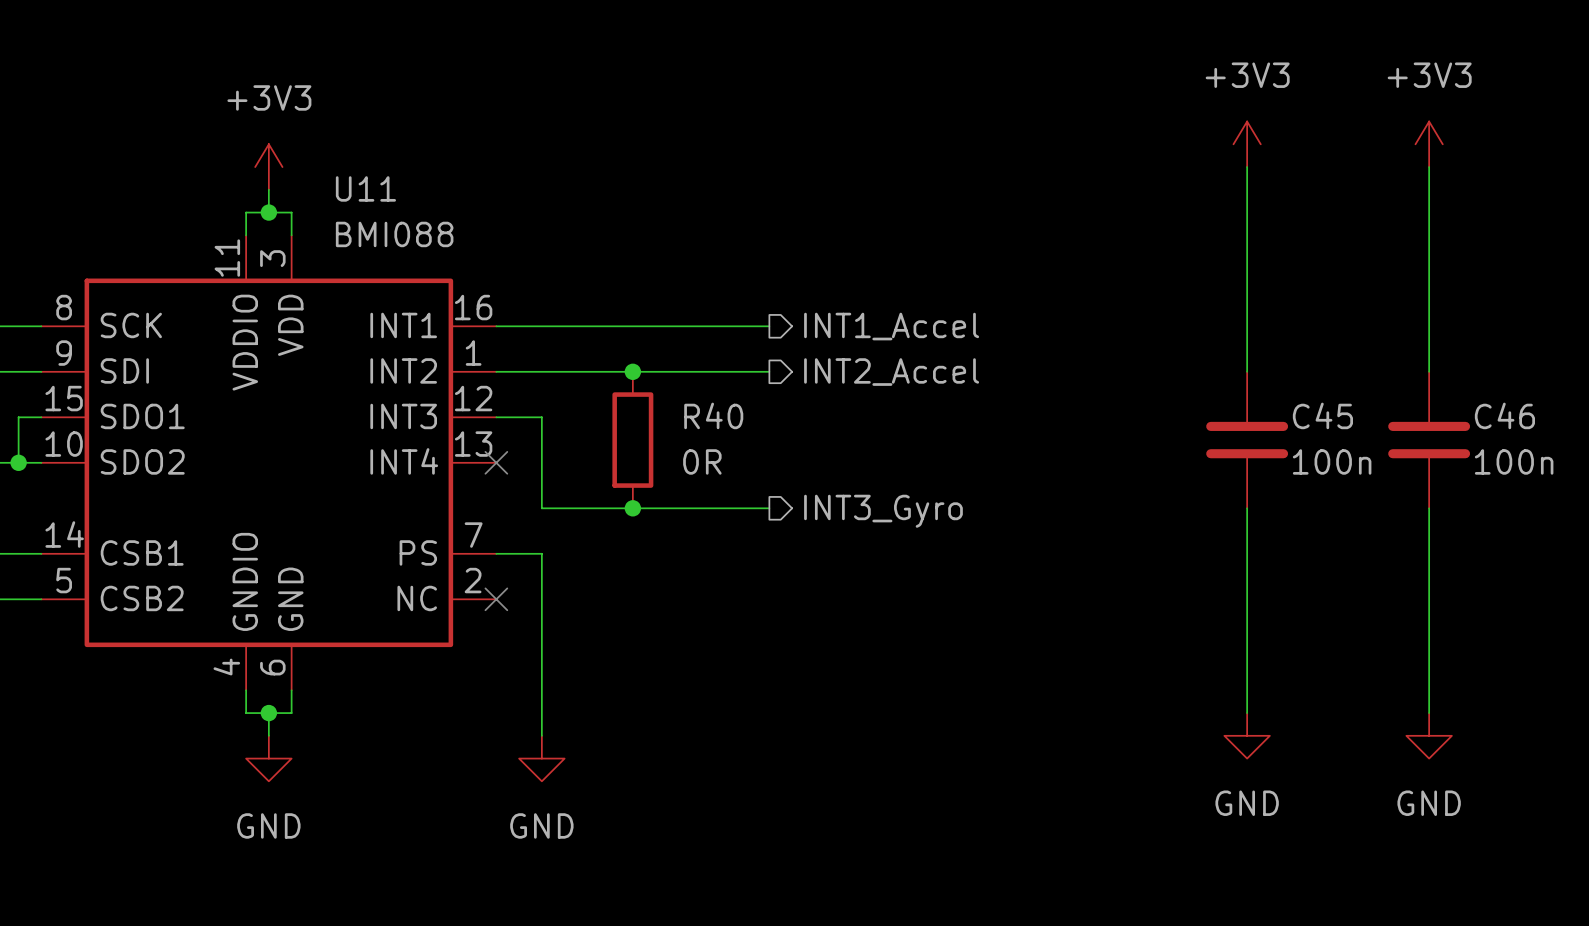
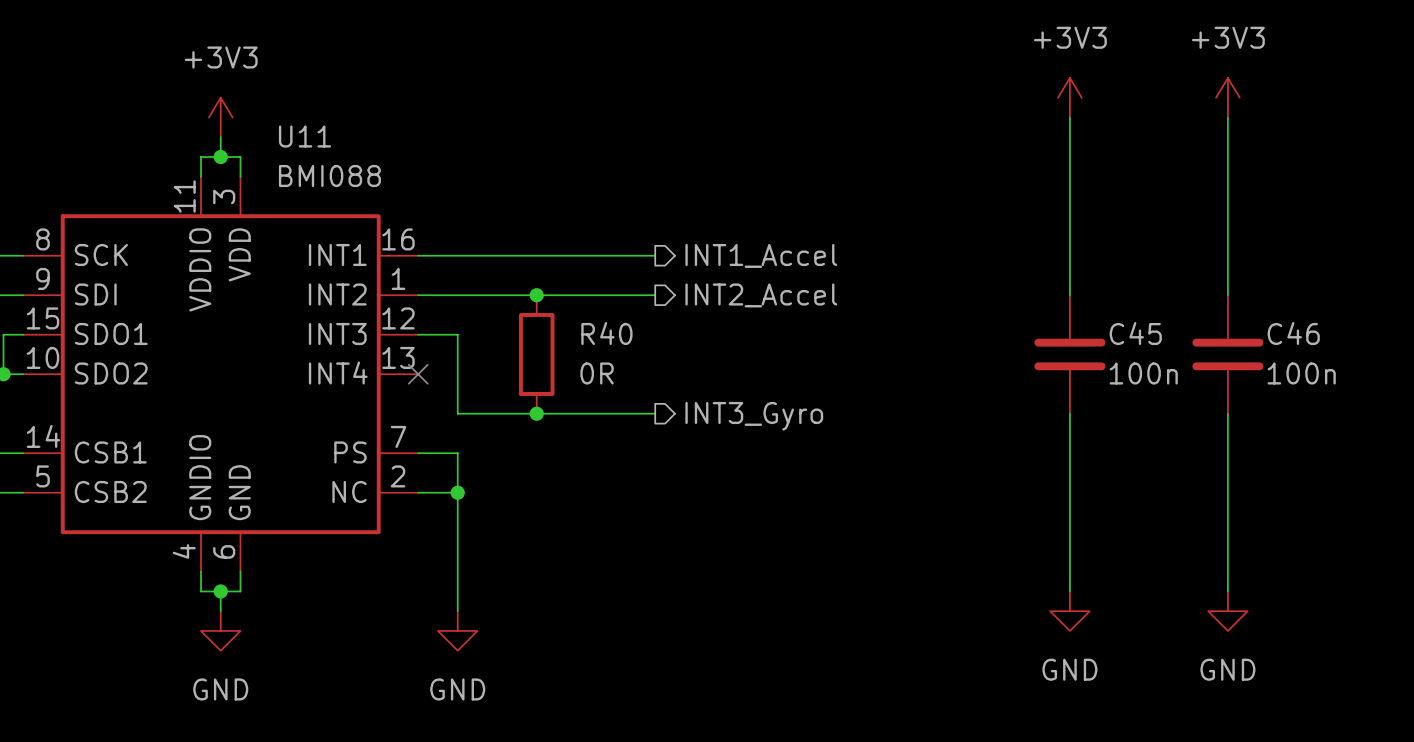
wire: none -> (418, 492) (457, 492)
no-connect mark: (496, 599) -> none
junction: none -> (457, 492)

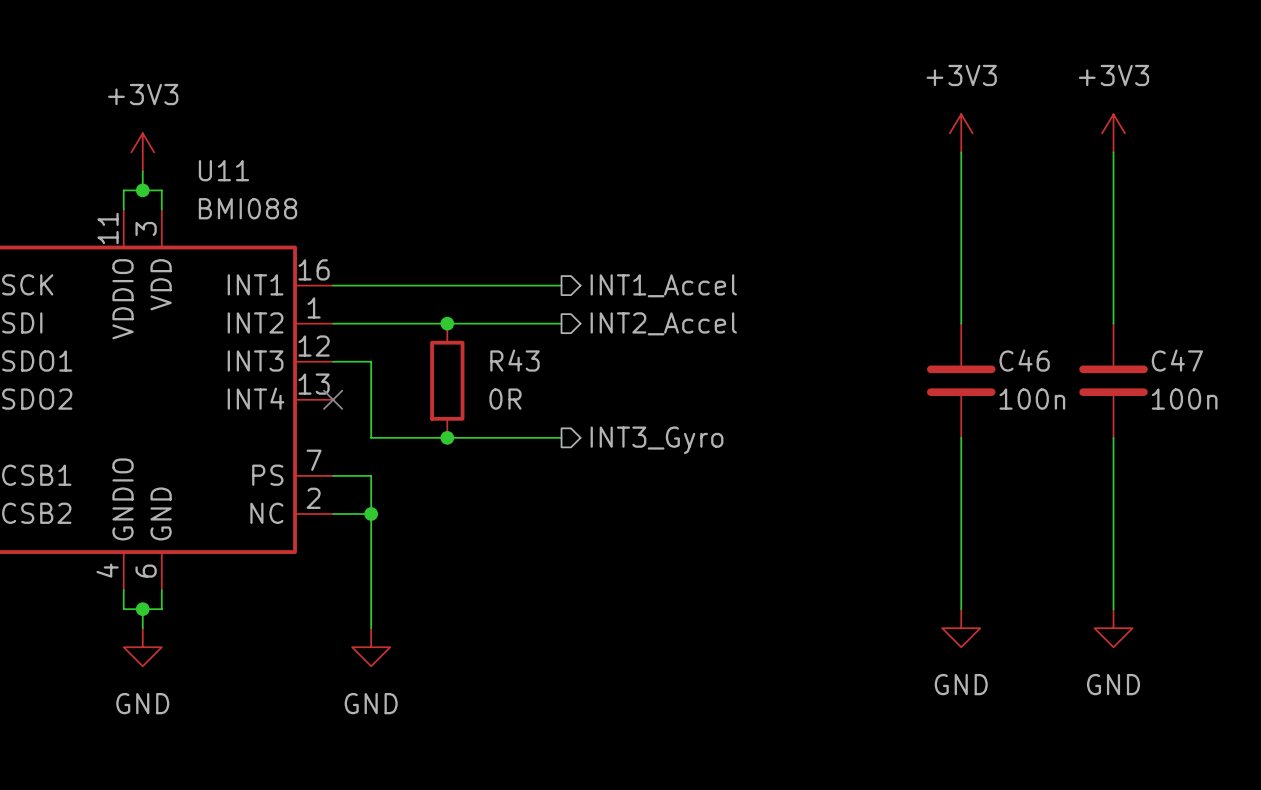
R40 name: R40 (606, 333) -> R43 (514, 360)
C45 name: C45 (1135, 333) -> C46 (1024, 360)
C46 name: C46 (1293, 333) -> C47 (1177, 360)

